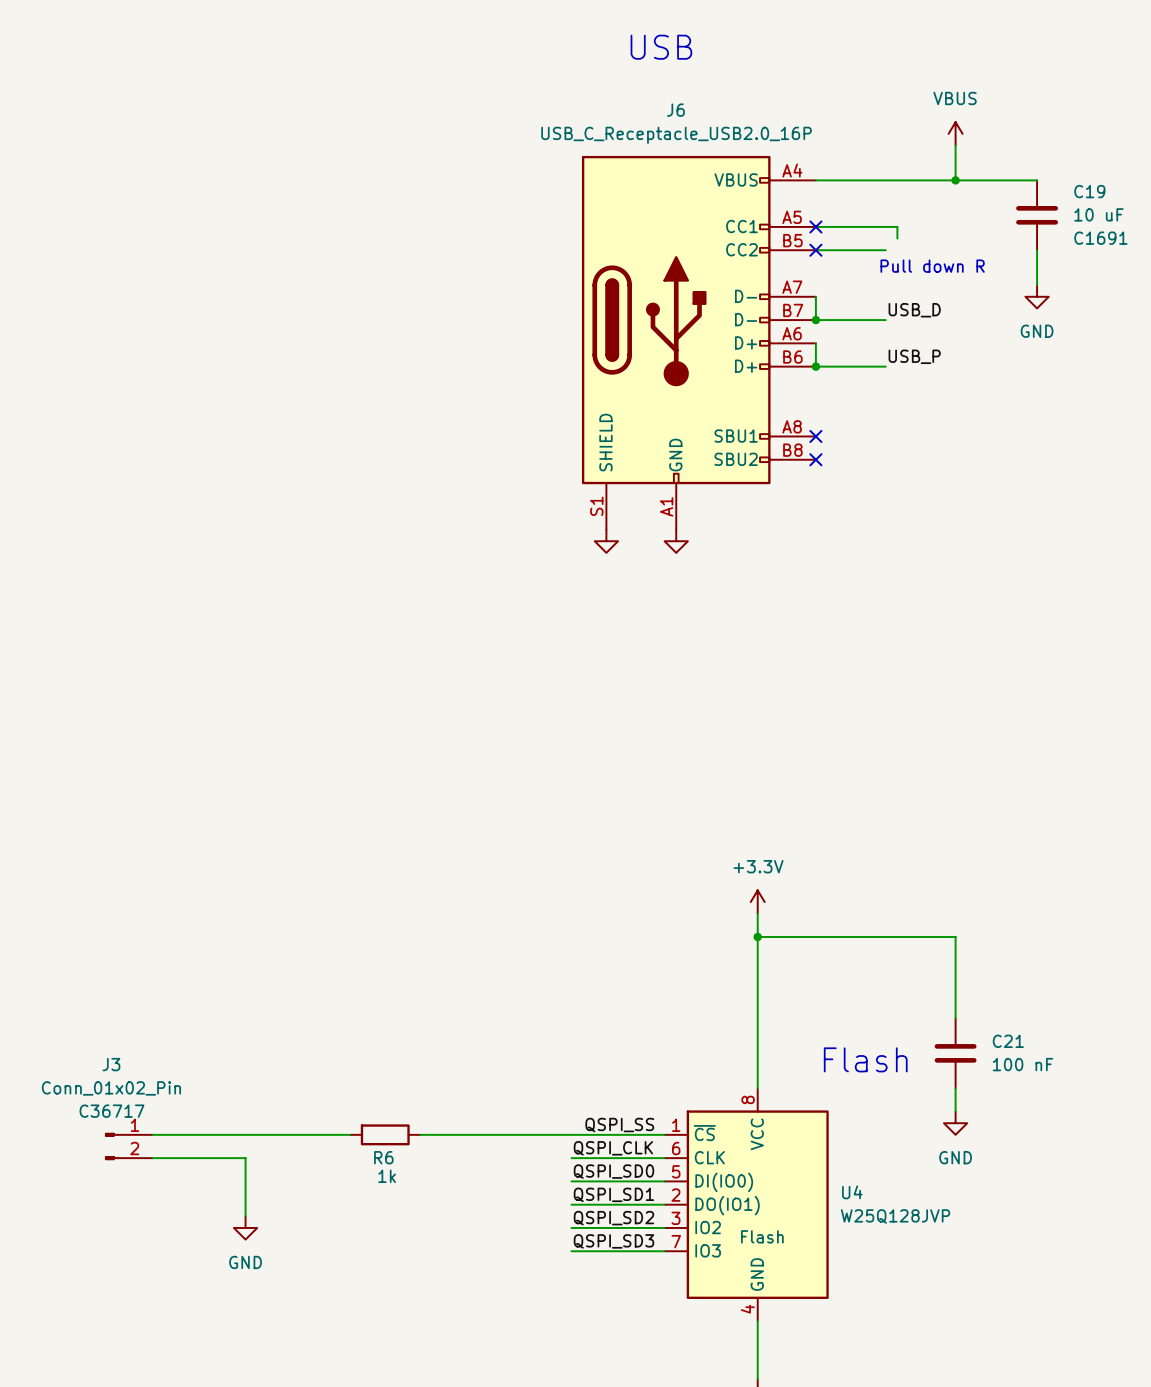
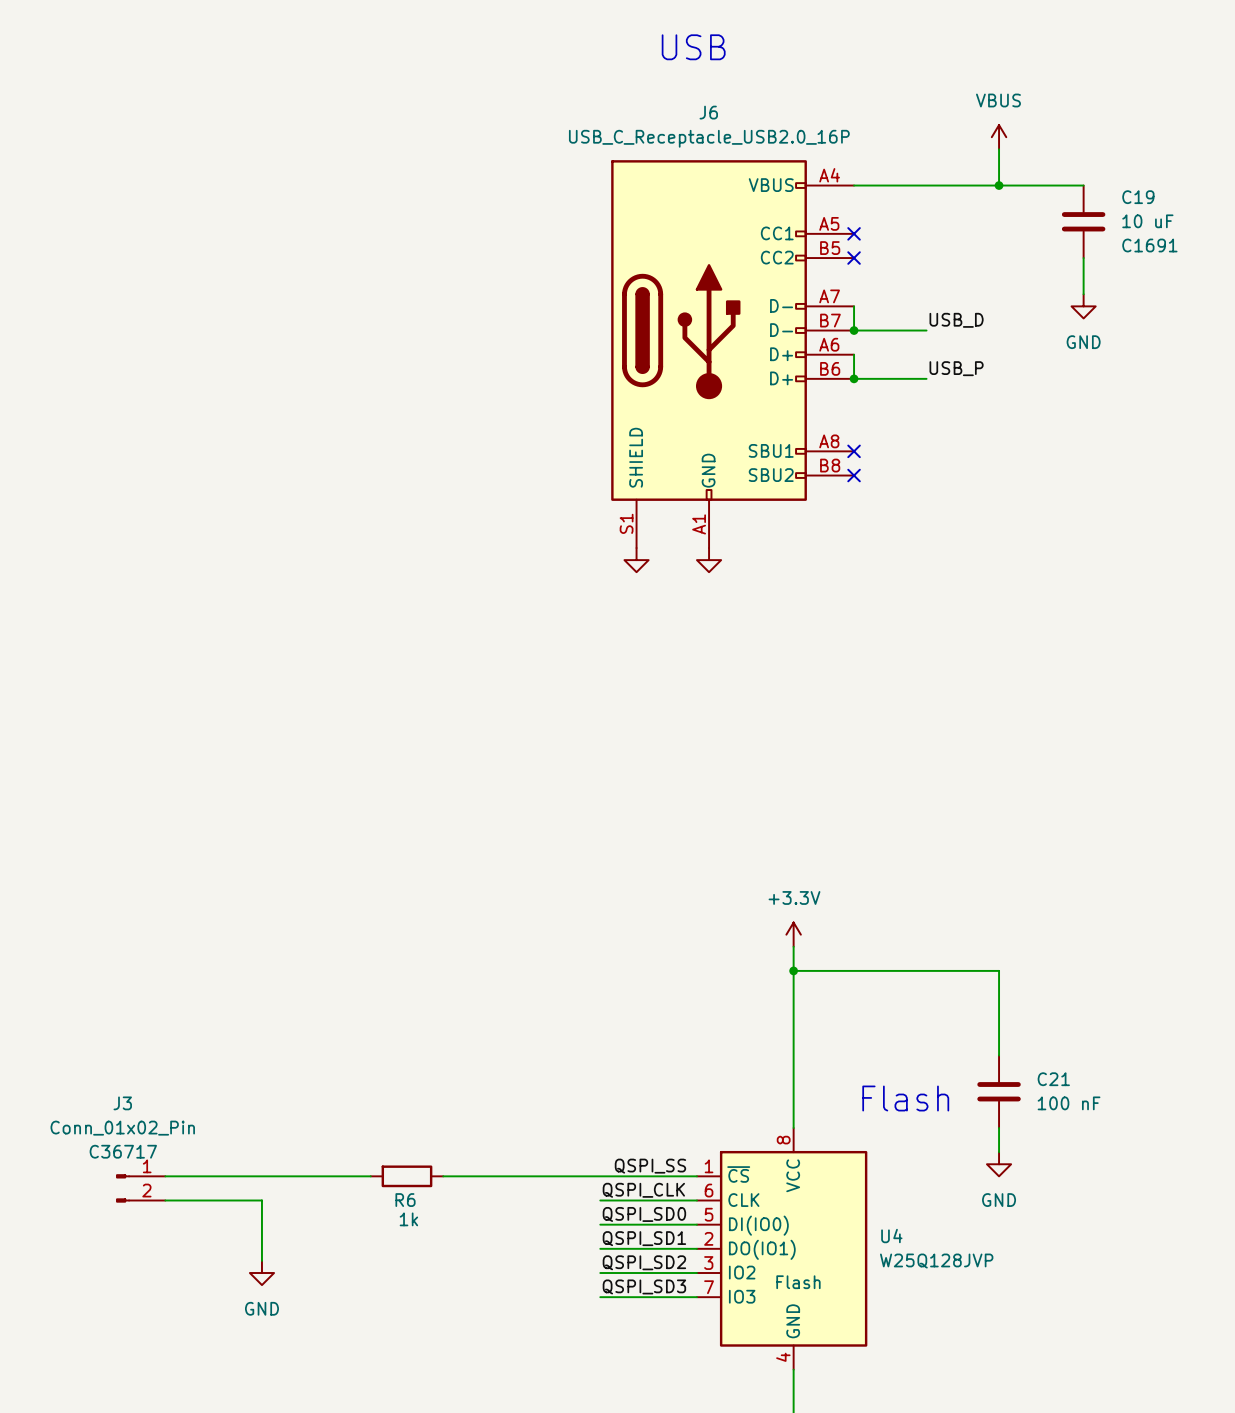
wire: (815, 226) (897, 226) (897, 238) -> none
wire: (815, 250) (885, 250) -> none
text: Pull down R (932, 266) -> none

